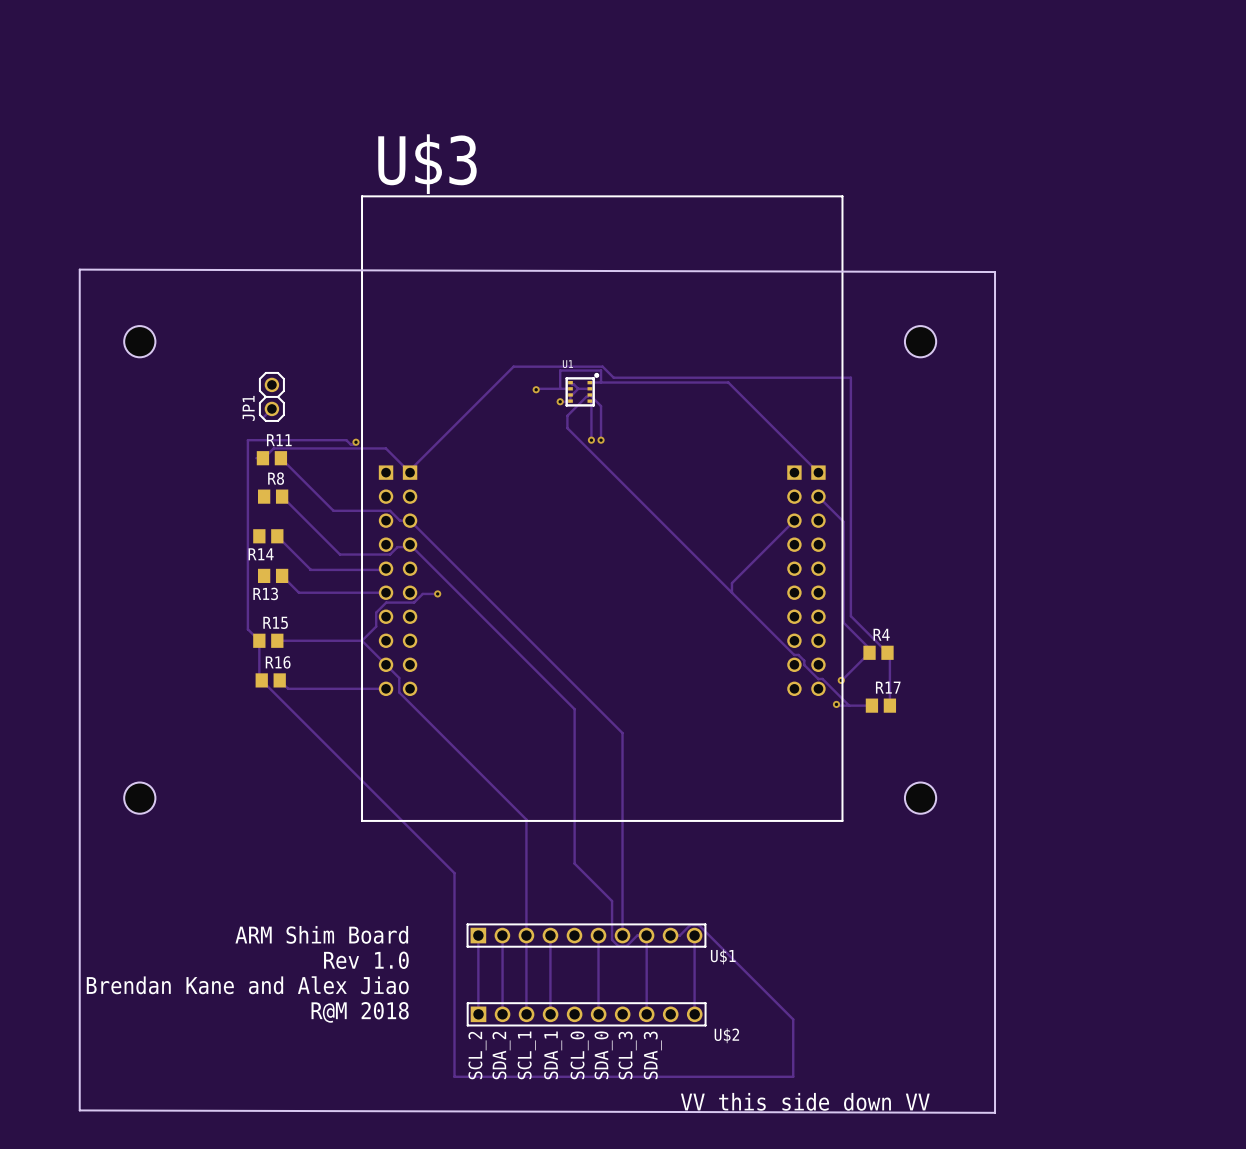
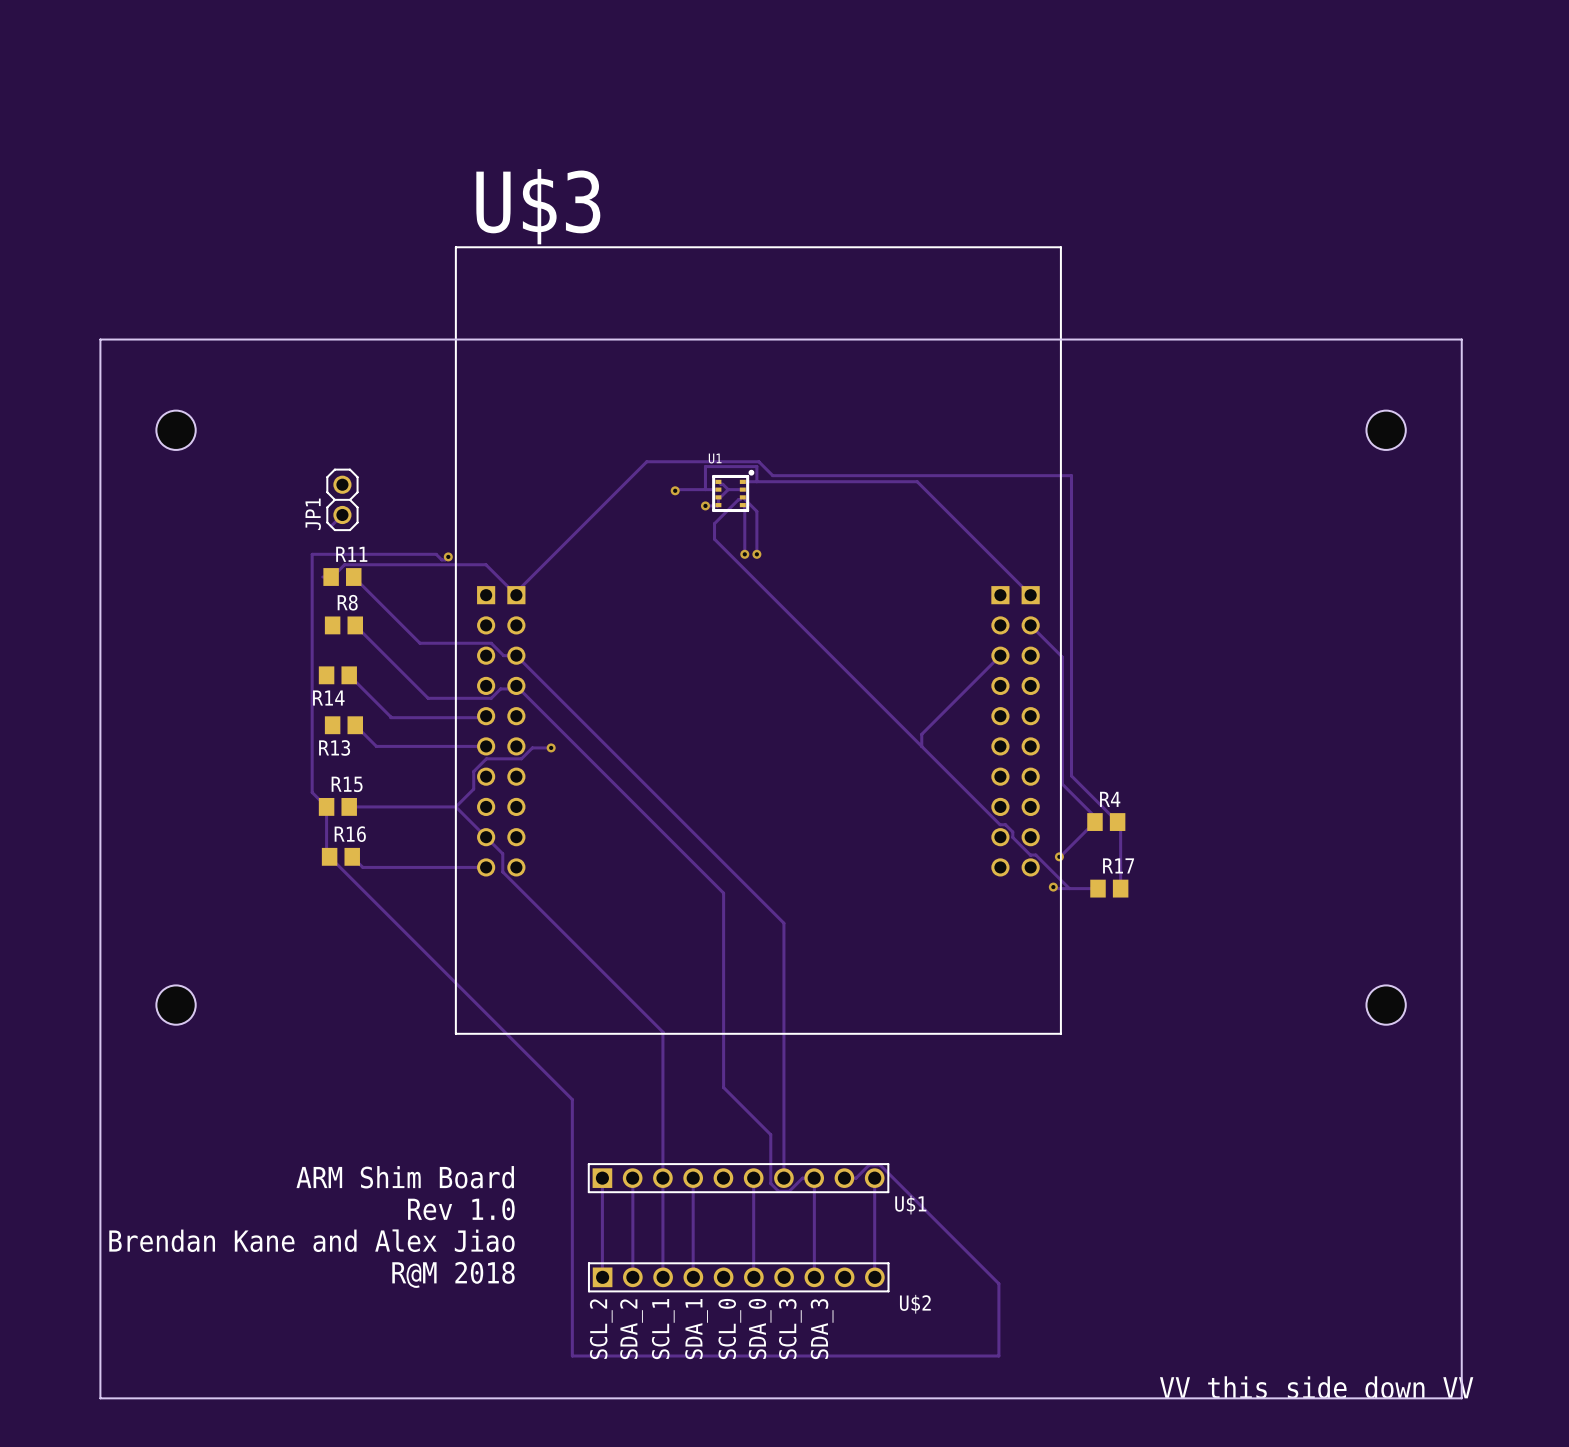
board edge: (79, 269) (995, 272) (995, 1112) (79, 1110) -> (100, 339) (1461, 339) (1461, 1398) (100, 1398)
hole position: (920, 341) -> (1386, 430)
hole position: (920, 798) -> (1386, 1005)
text: VV this side down VV (805, 1101) -> none
text: none -> VV this side down VV (1316, 1387)

